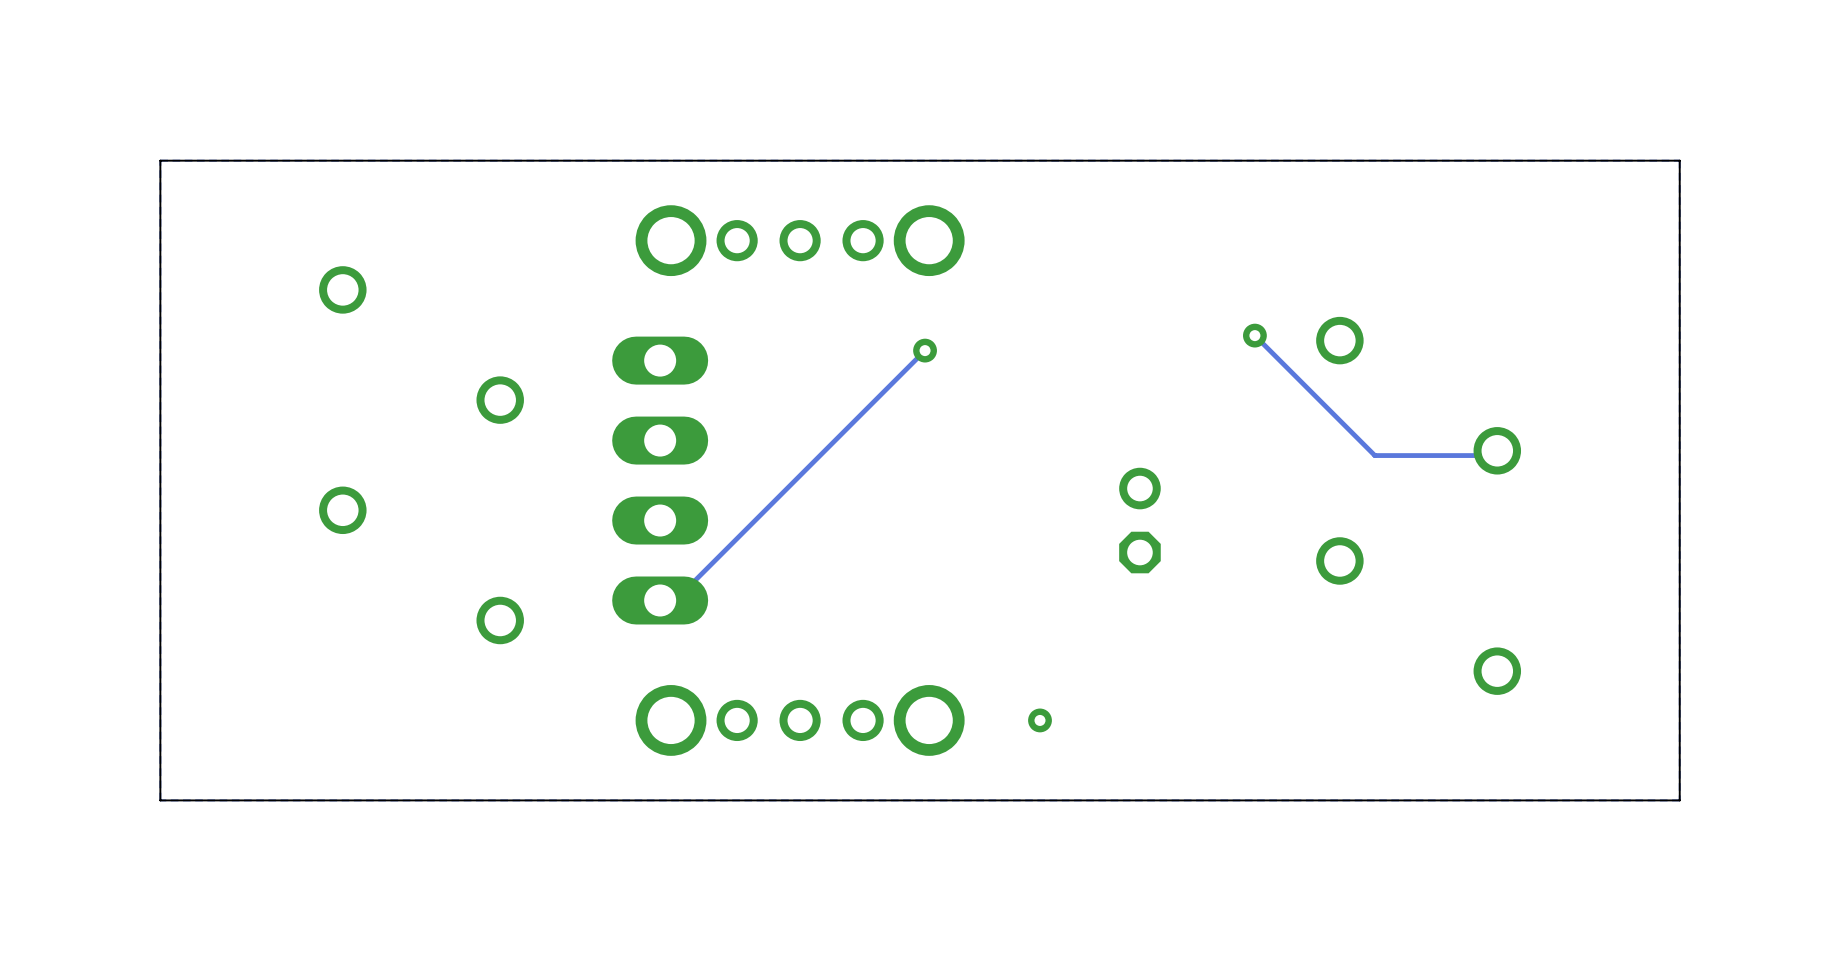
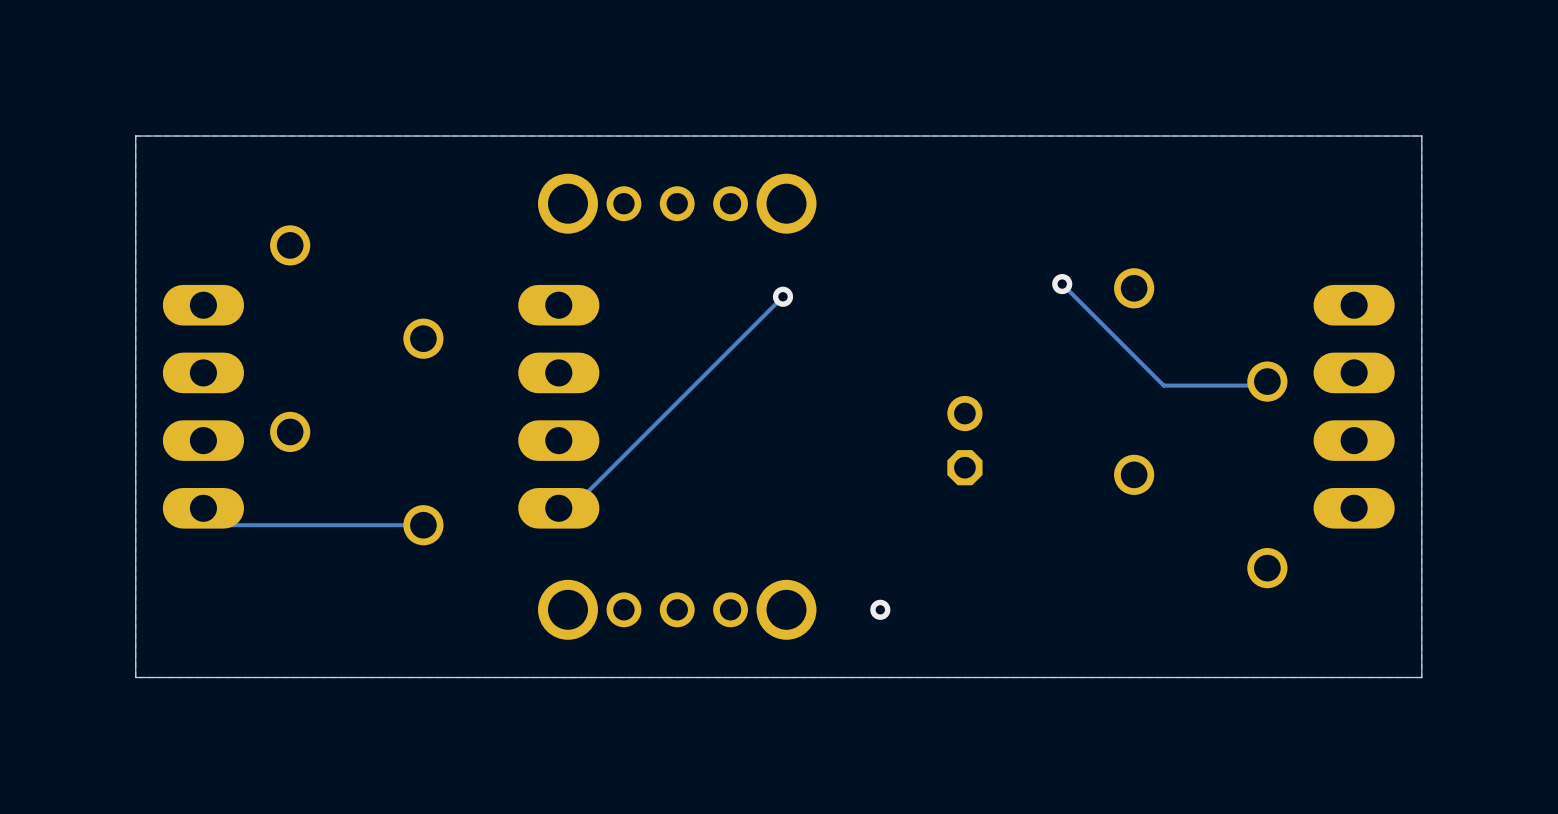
part: none -> (203, 406)
part: none -> (1354, 406)
track: none -> (203, 508) (220, 525) (423, 525)

